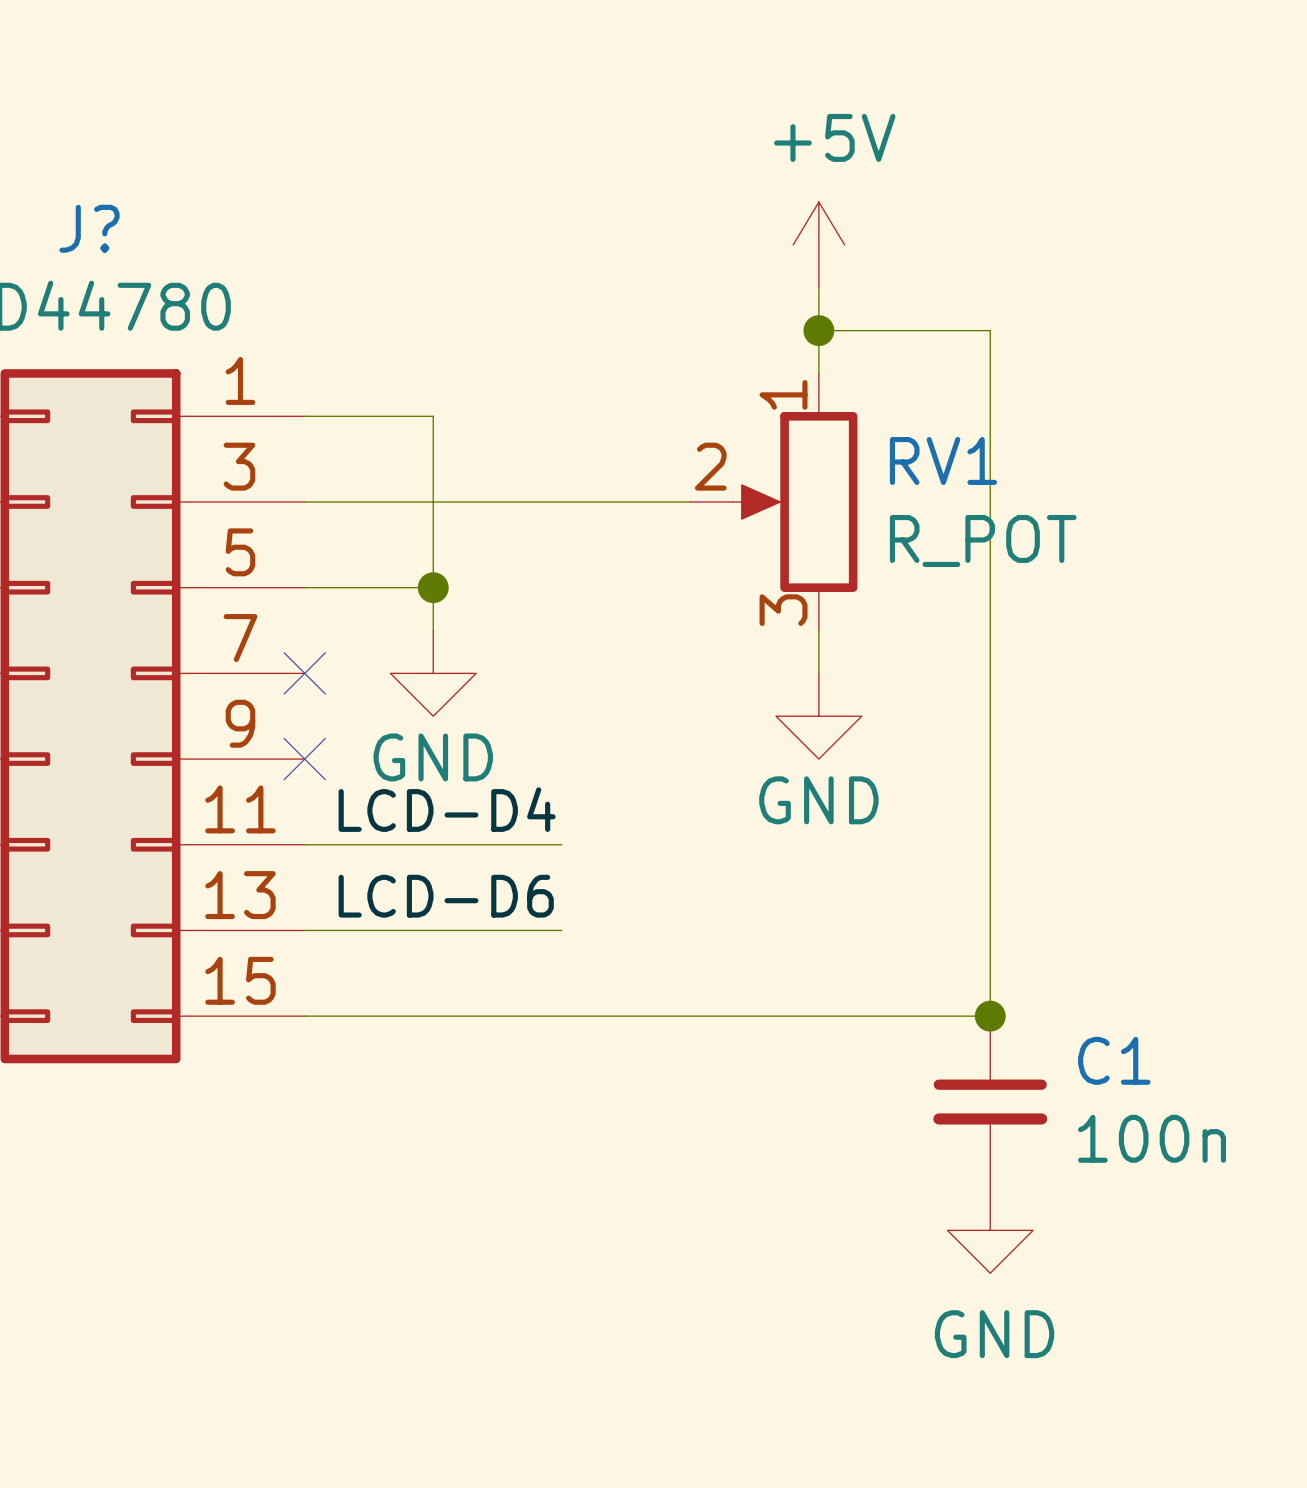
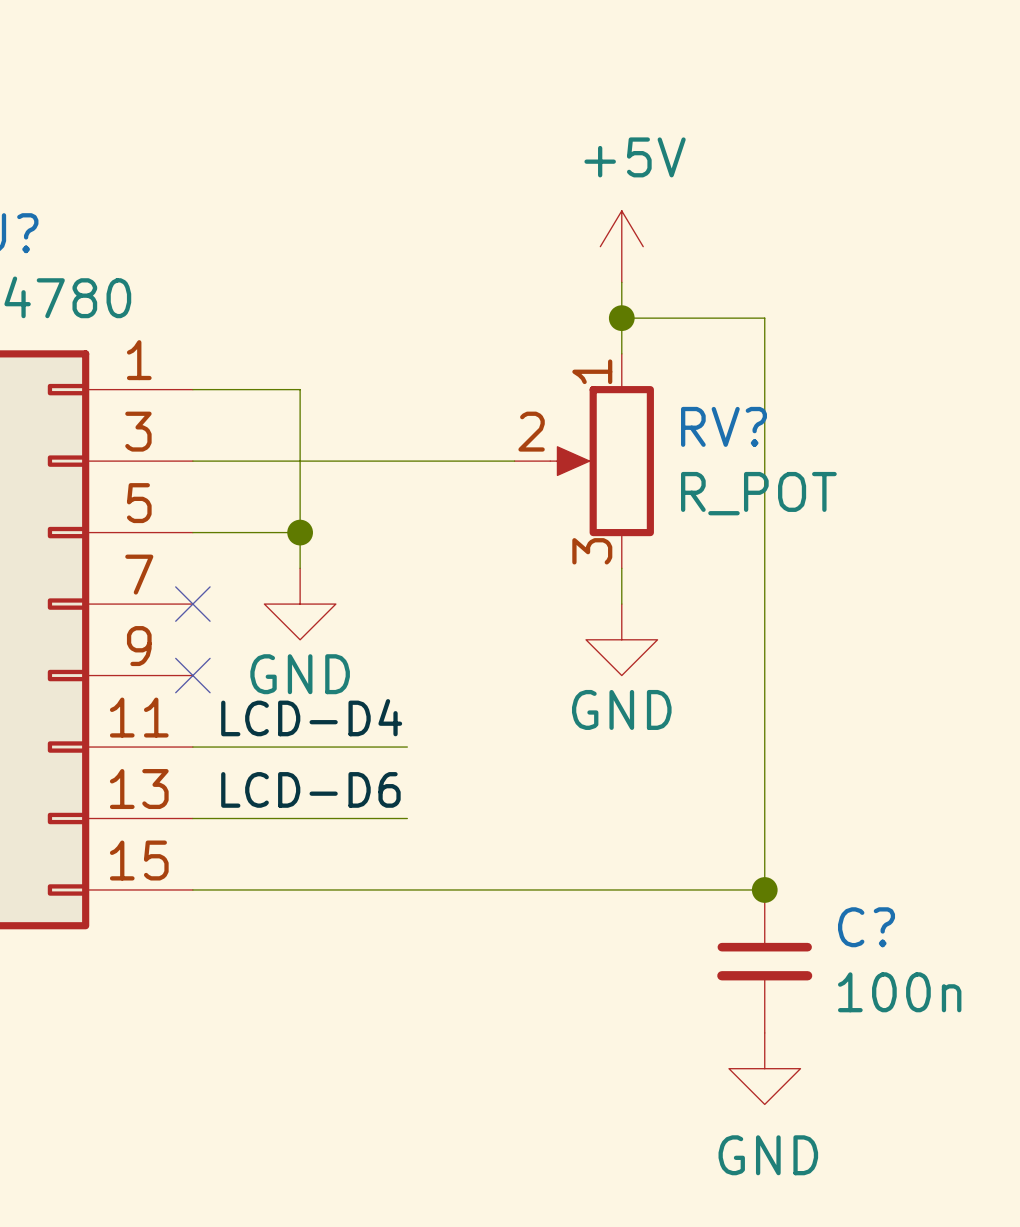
RV1 name: RV1 (943, 460) -> RV? (723, 426)
C1 name: C1 (1114, 1060) -> C? (866, 927)

